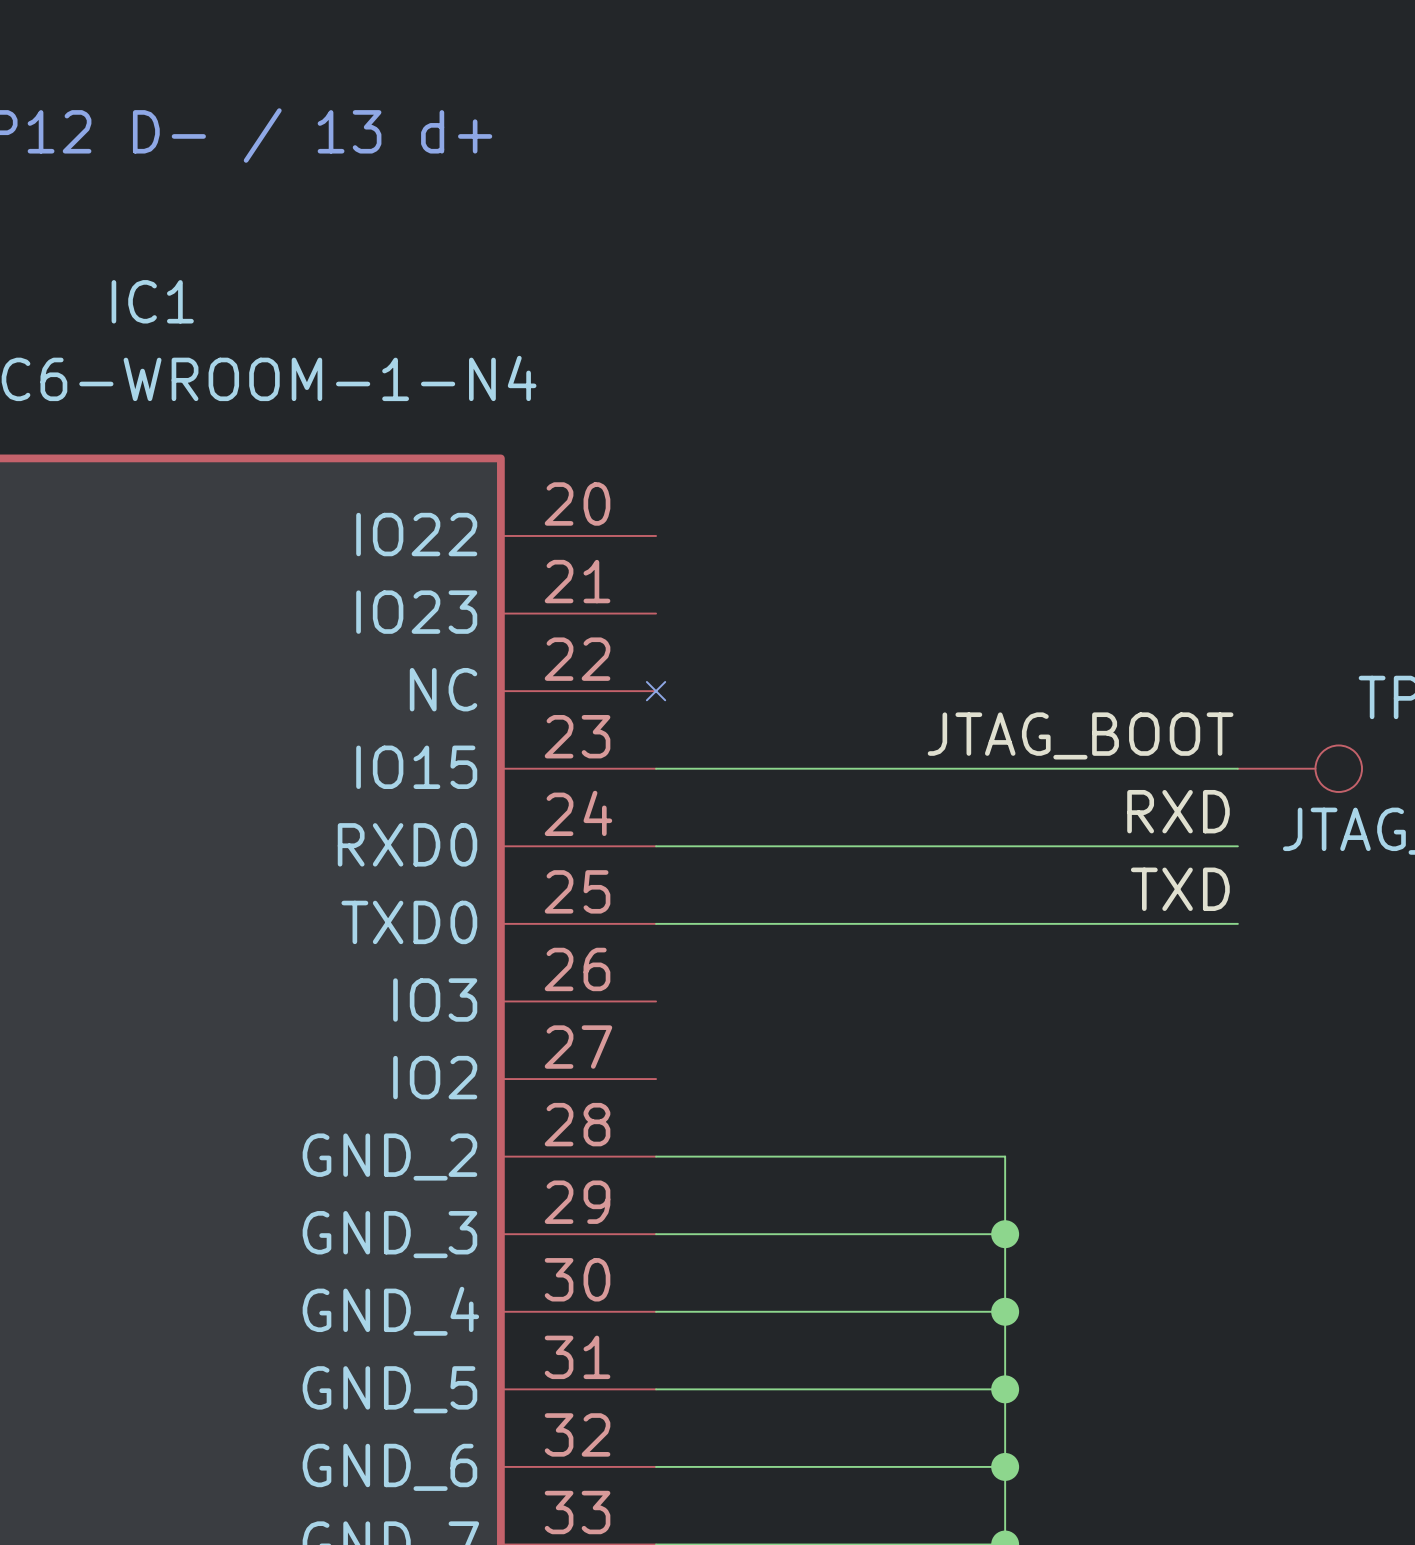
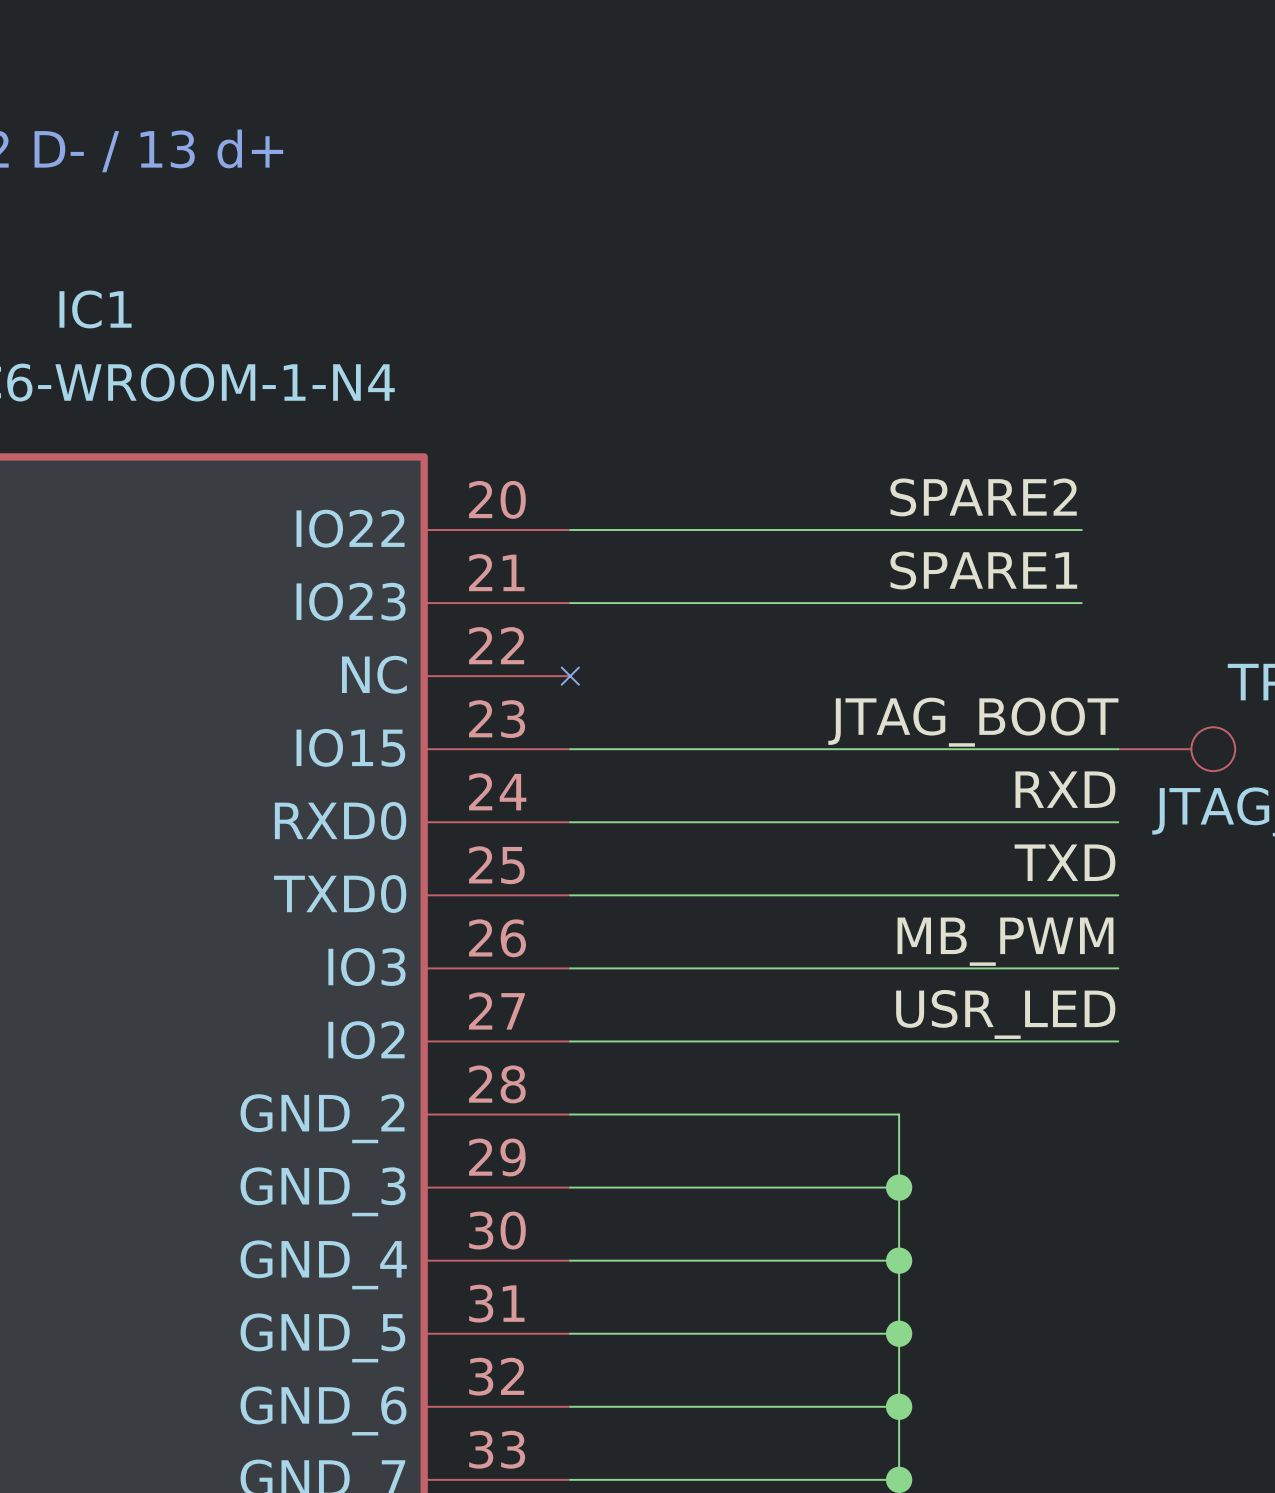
label: none -> SPARE2 (983, 497)
wire: none -> (570, 530) (1081, 530)
label: none -> SPARE1 (983, 570)
wire: none -> (570, 603) (1081, 603)
label: none -> MB_PWM (1005, 941)
wire: none -> (570, 968) (1118, 968)
label: none -> USR_LED (1005, 1014)
wire: none -> (570, 1041) (1118, 1041)

